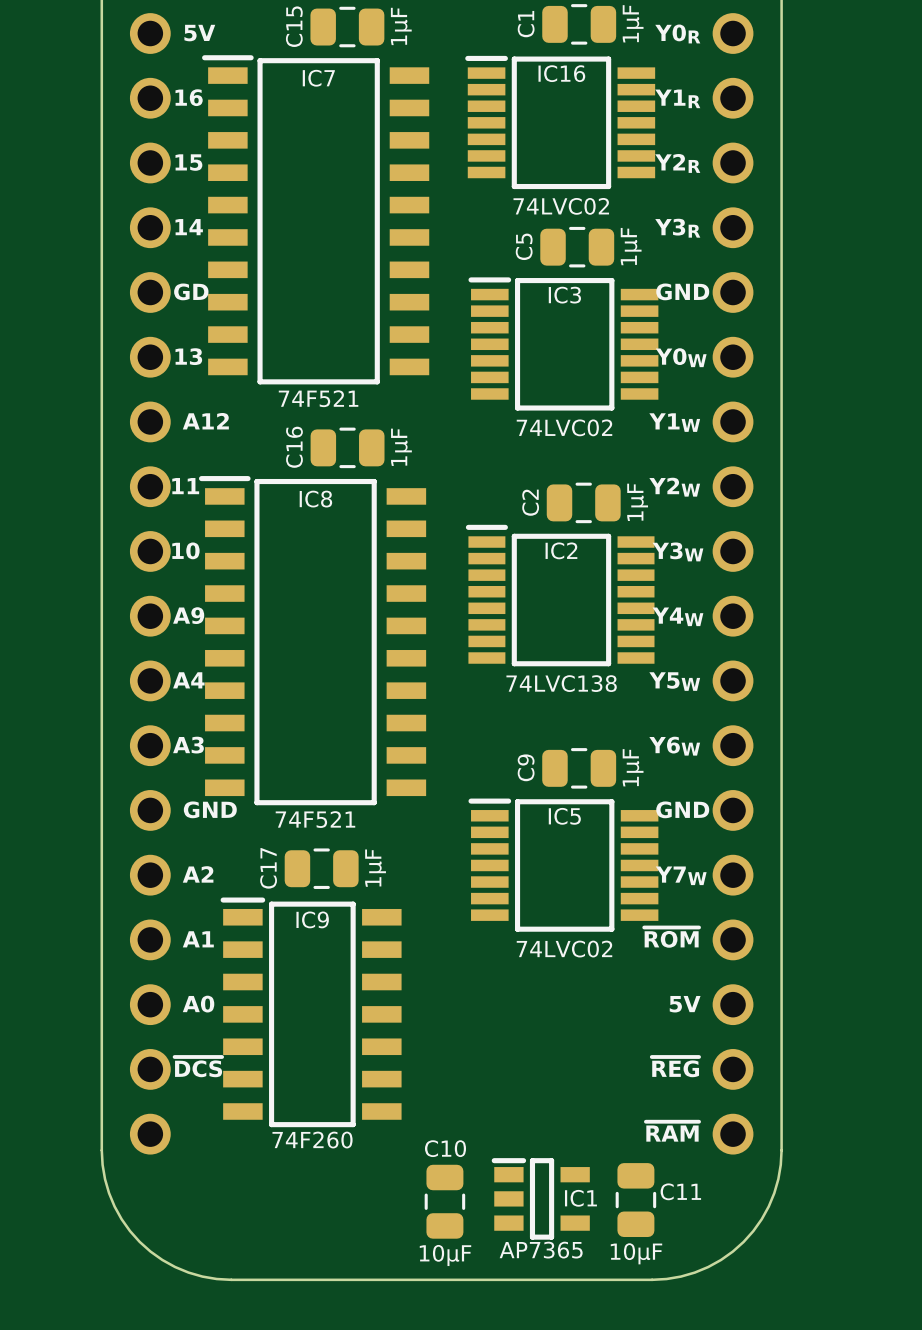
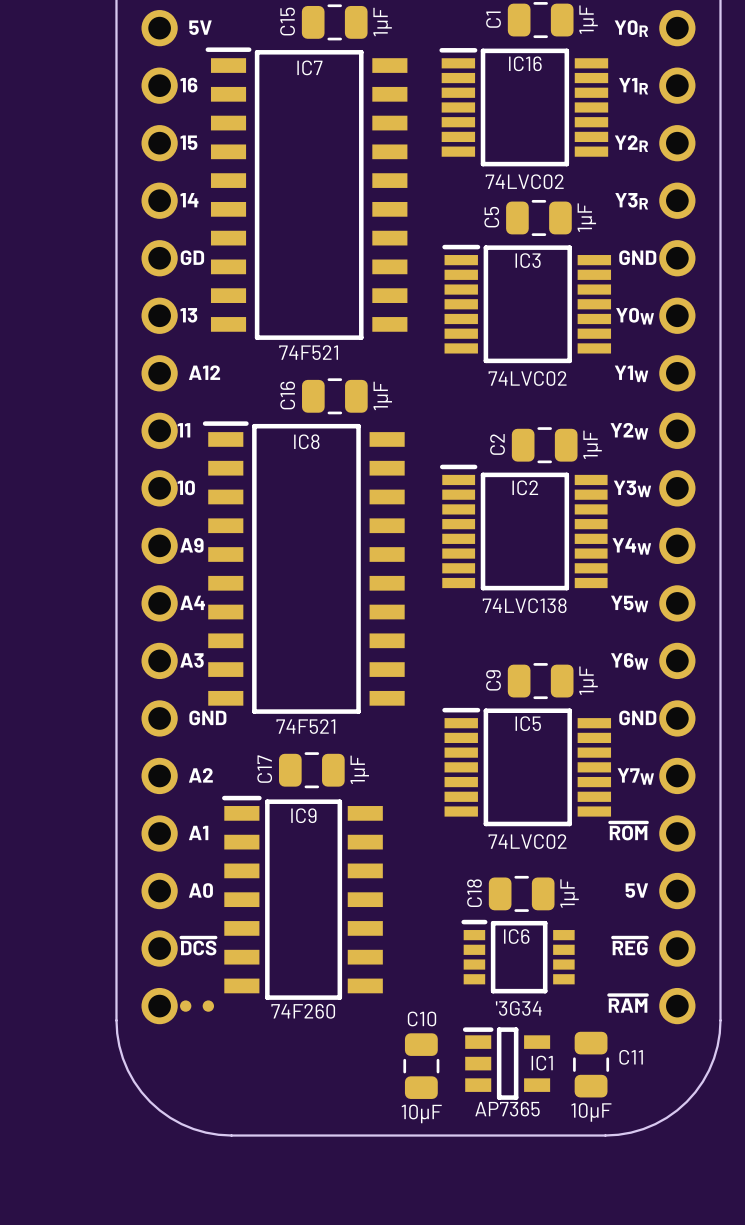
C18: none -> 1μF (521, 893)
IC6: none -> (518, 956)
part: none -> (197, 1006)

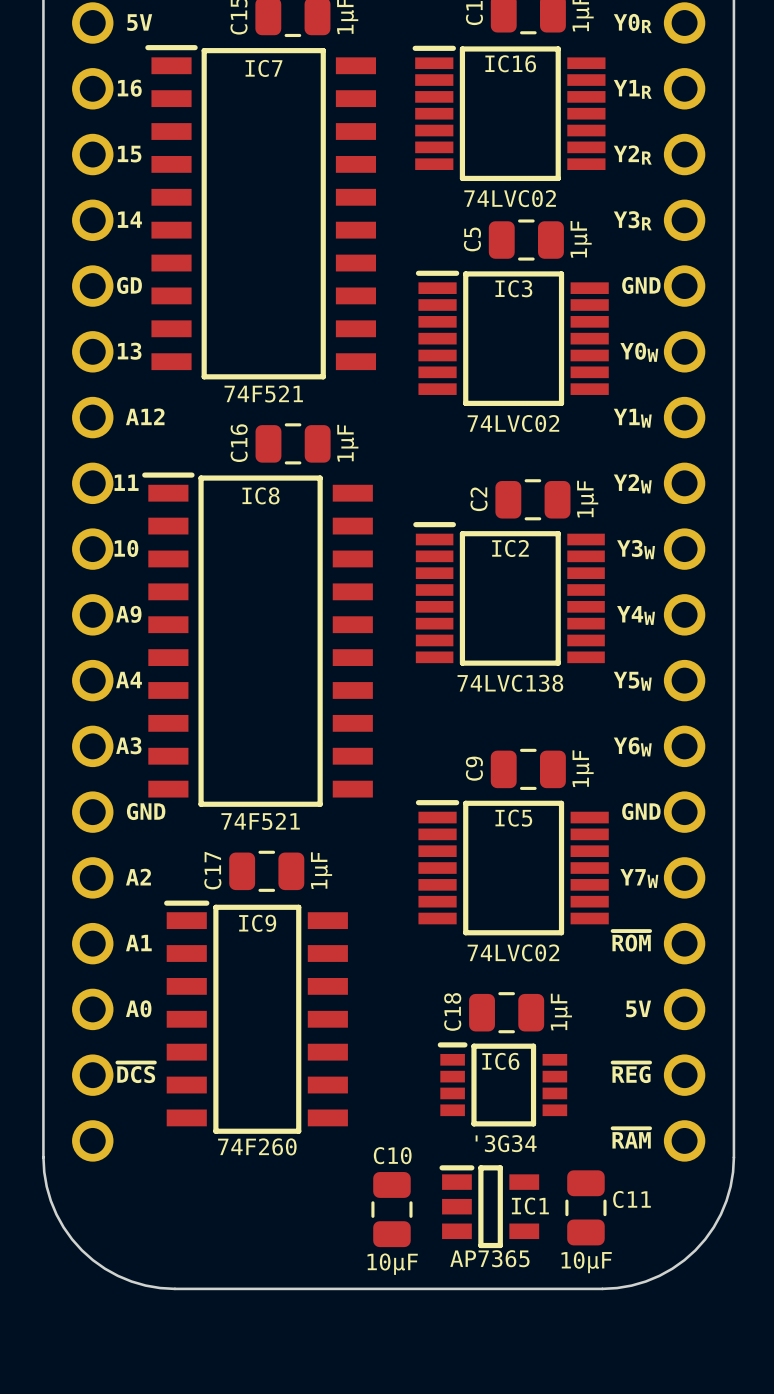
part: (197, 1006) -> none

